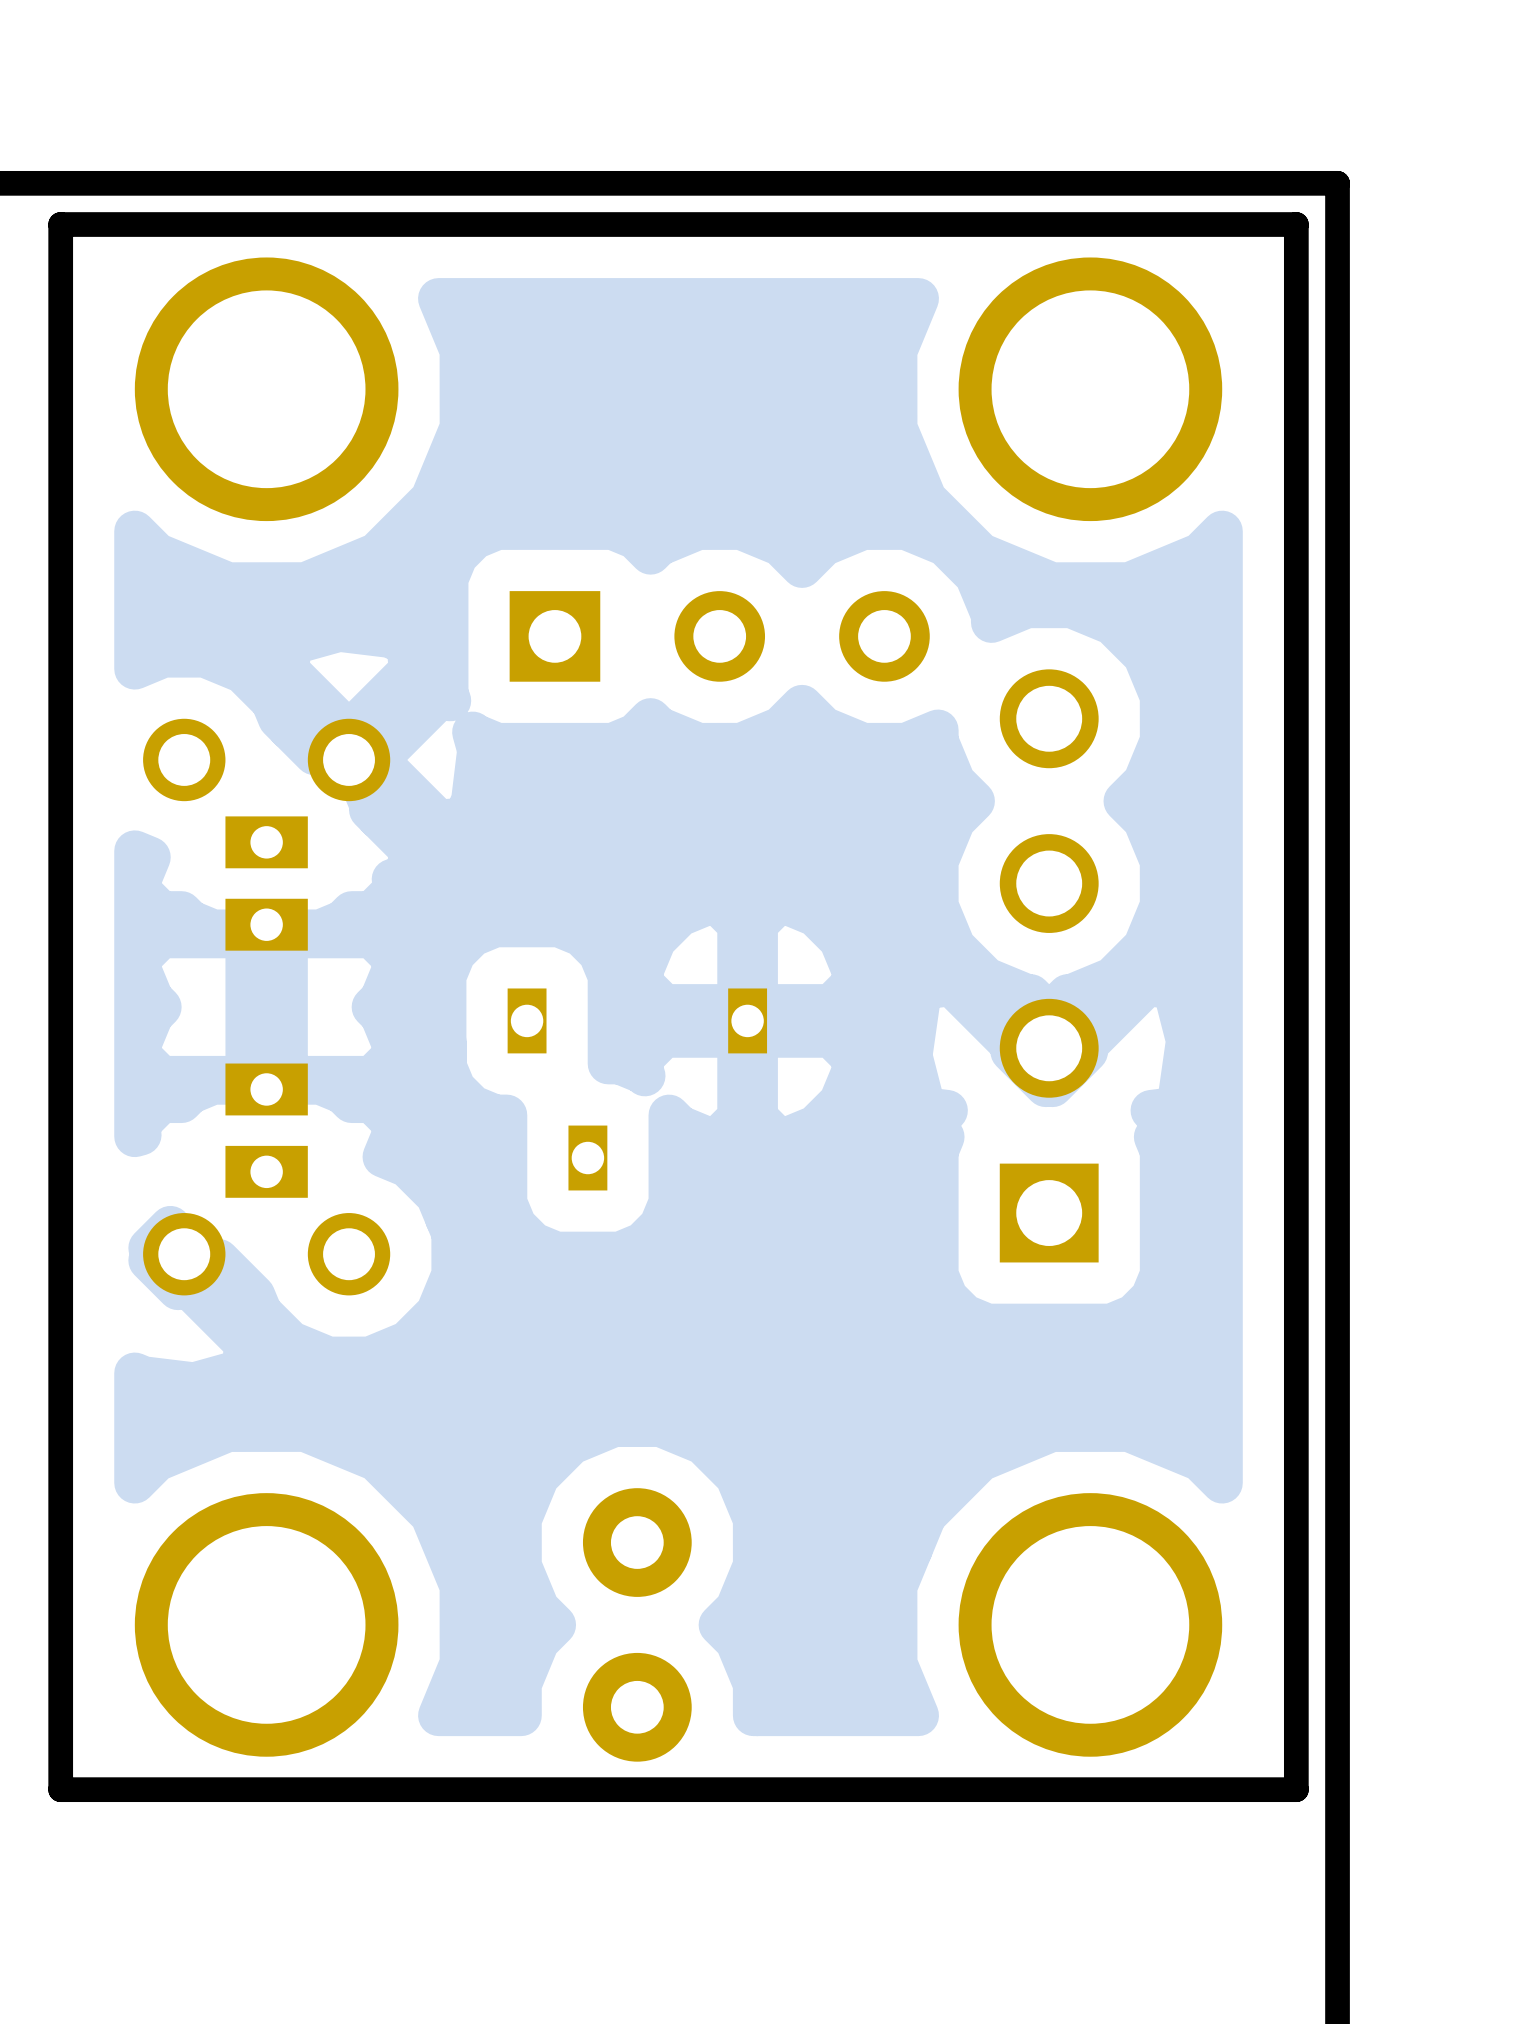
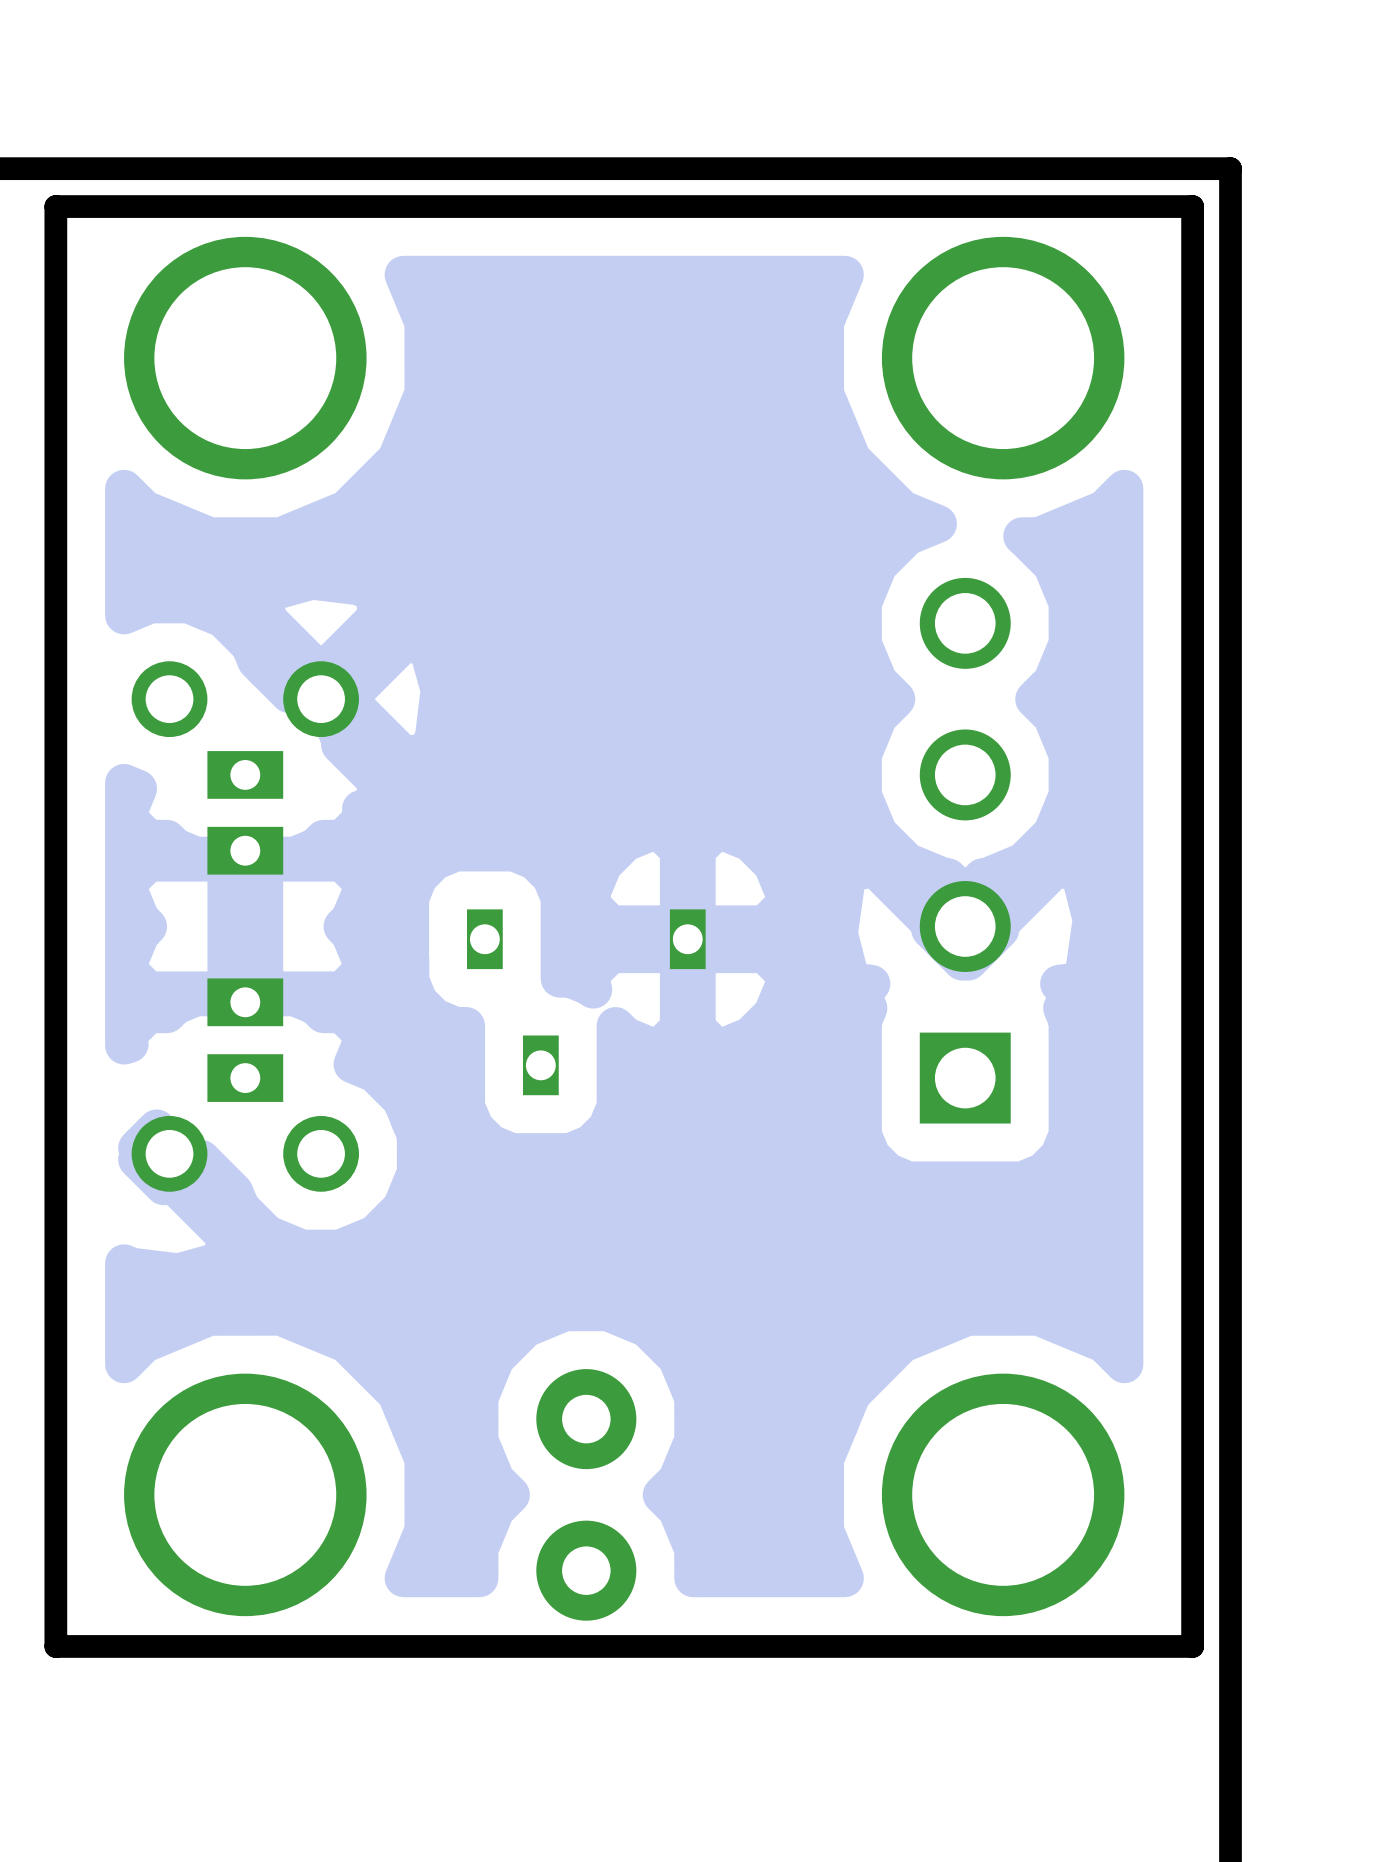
part: (719, 636) -> none
part position: (1049, 965) -> (965, 850)

